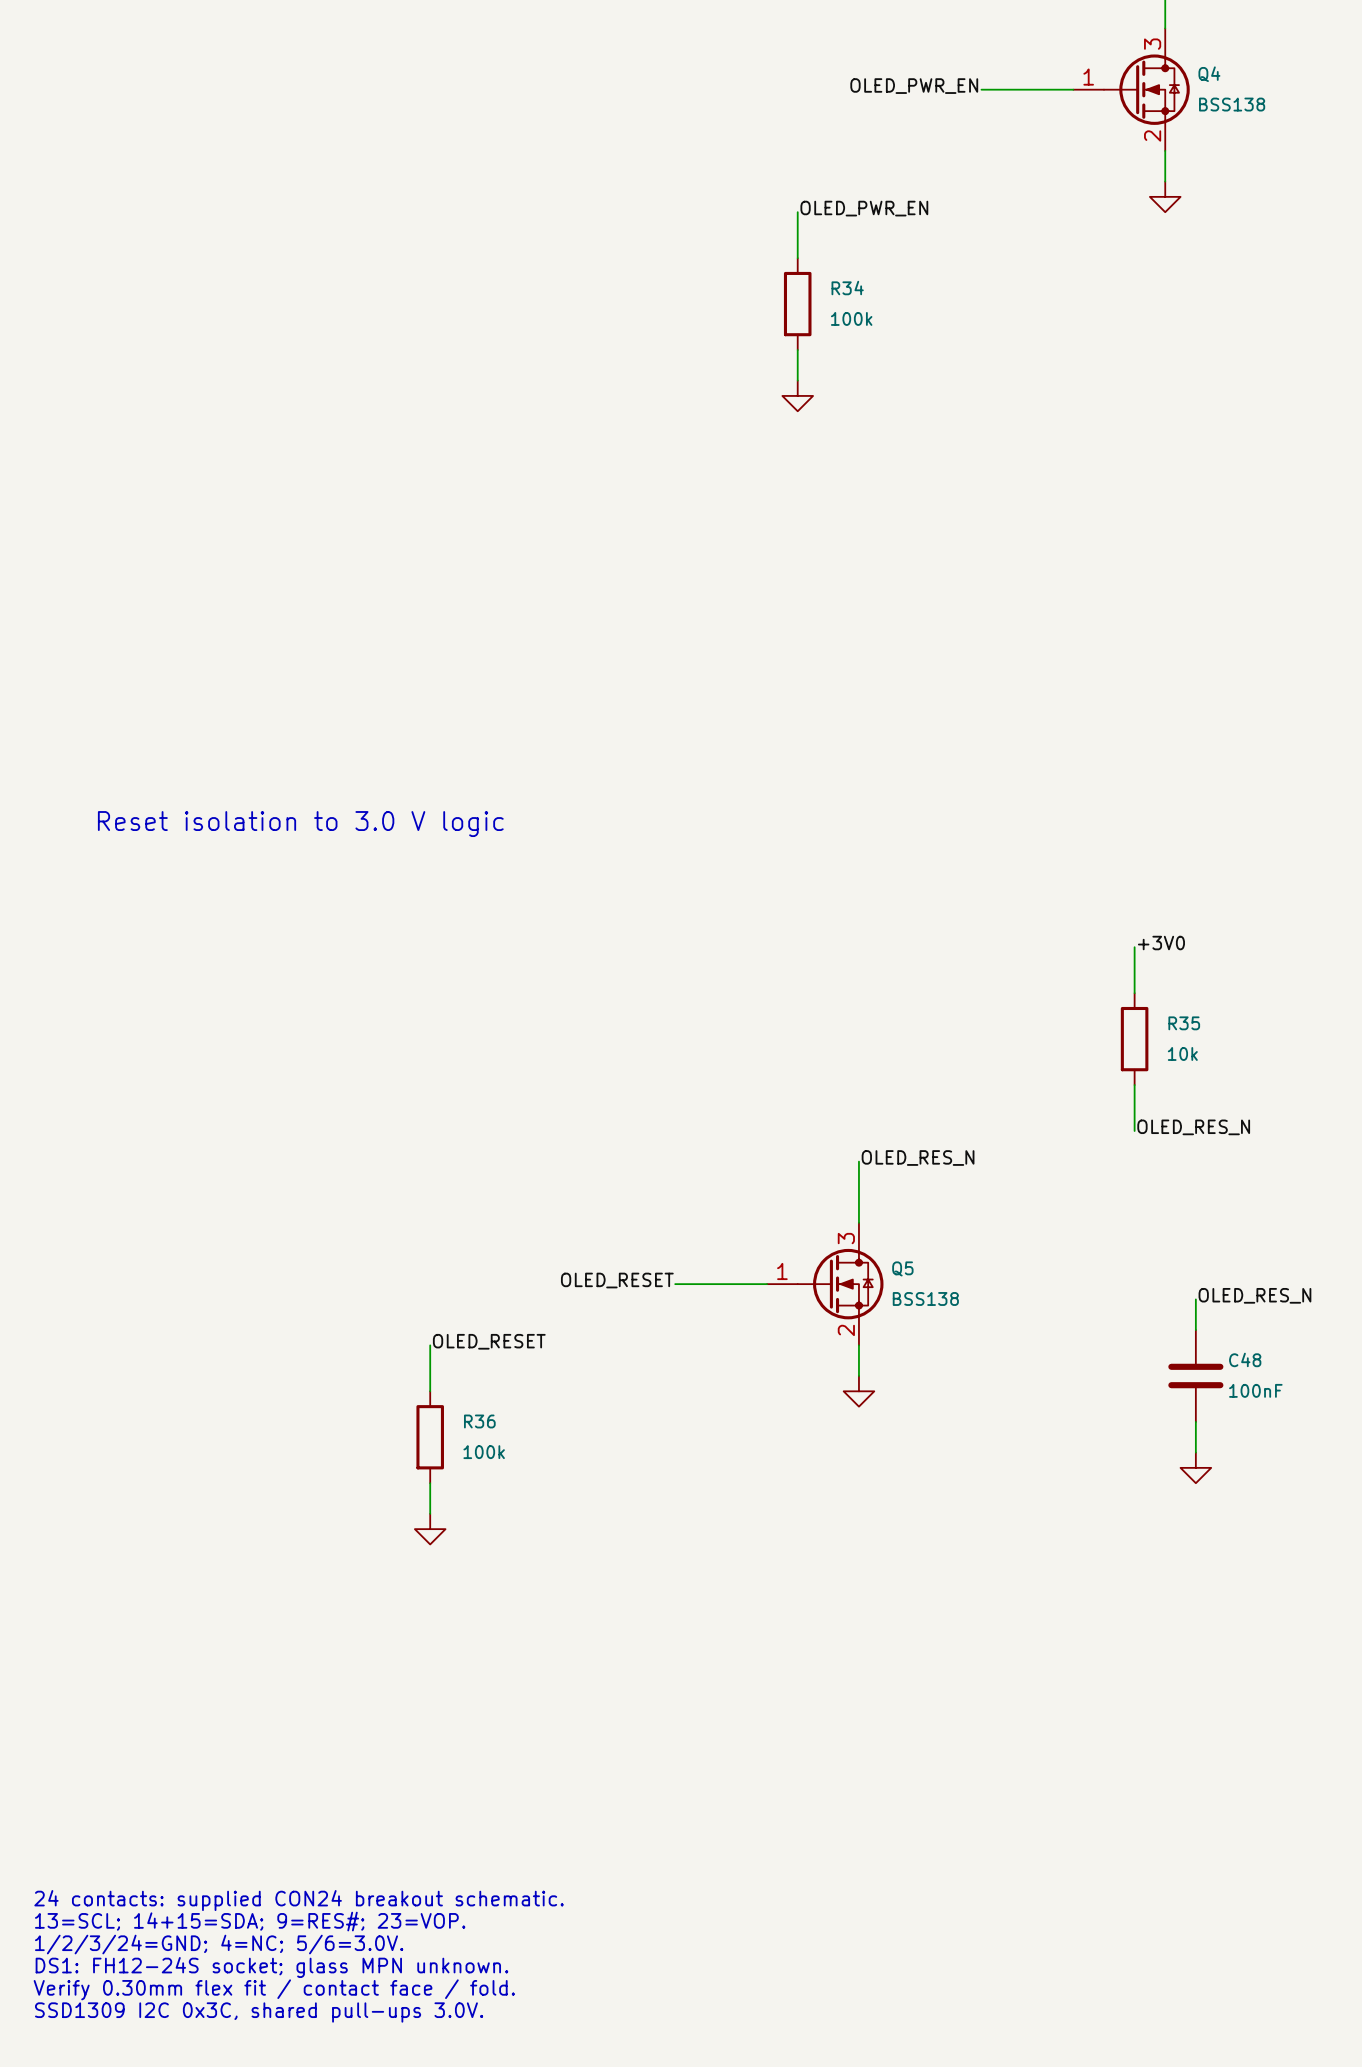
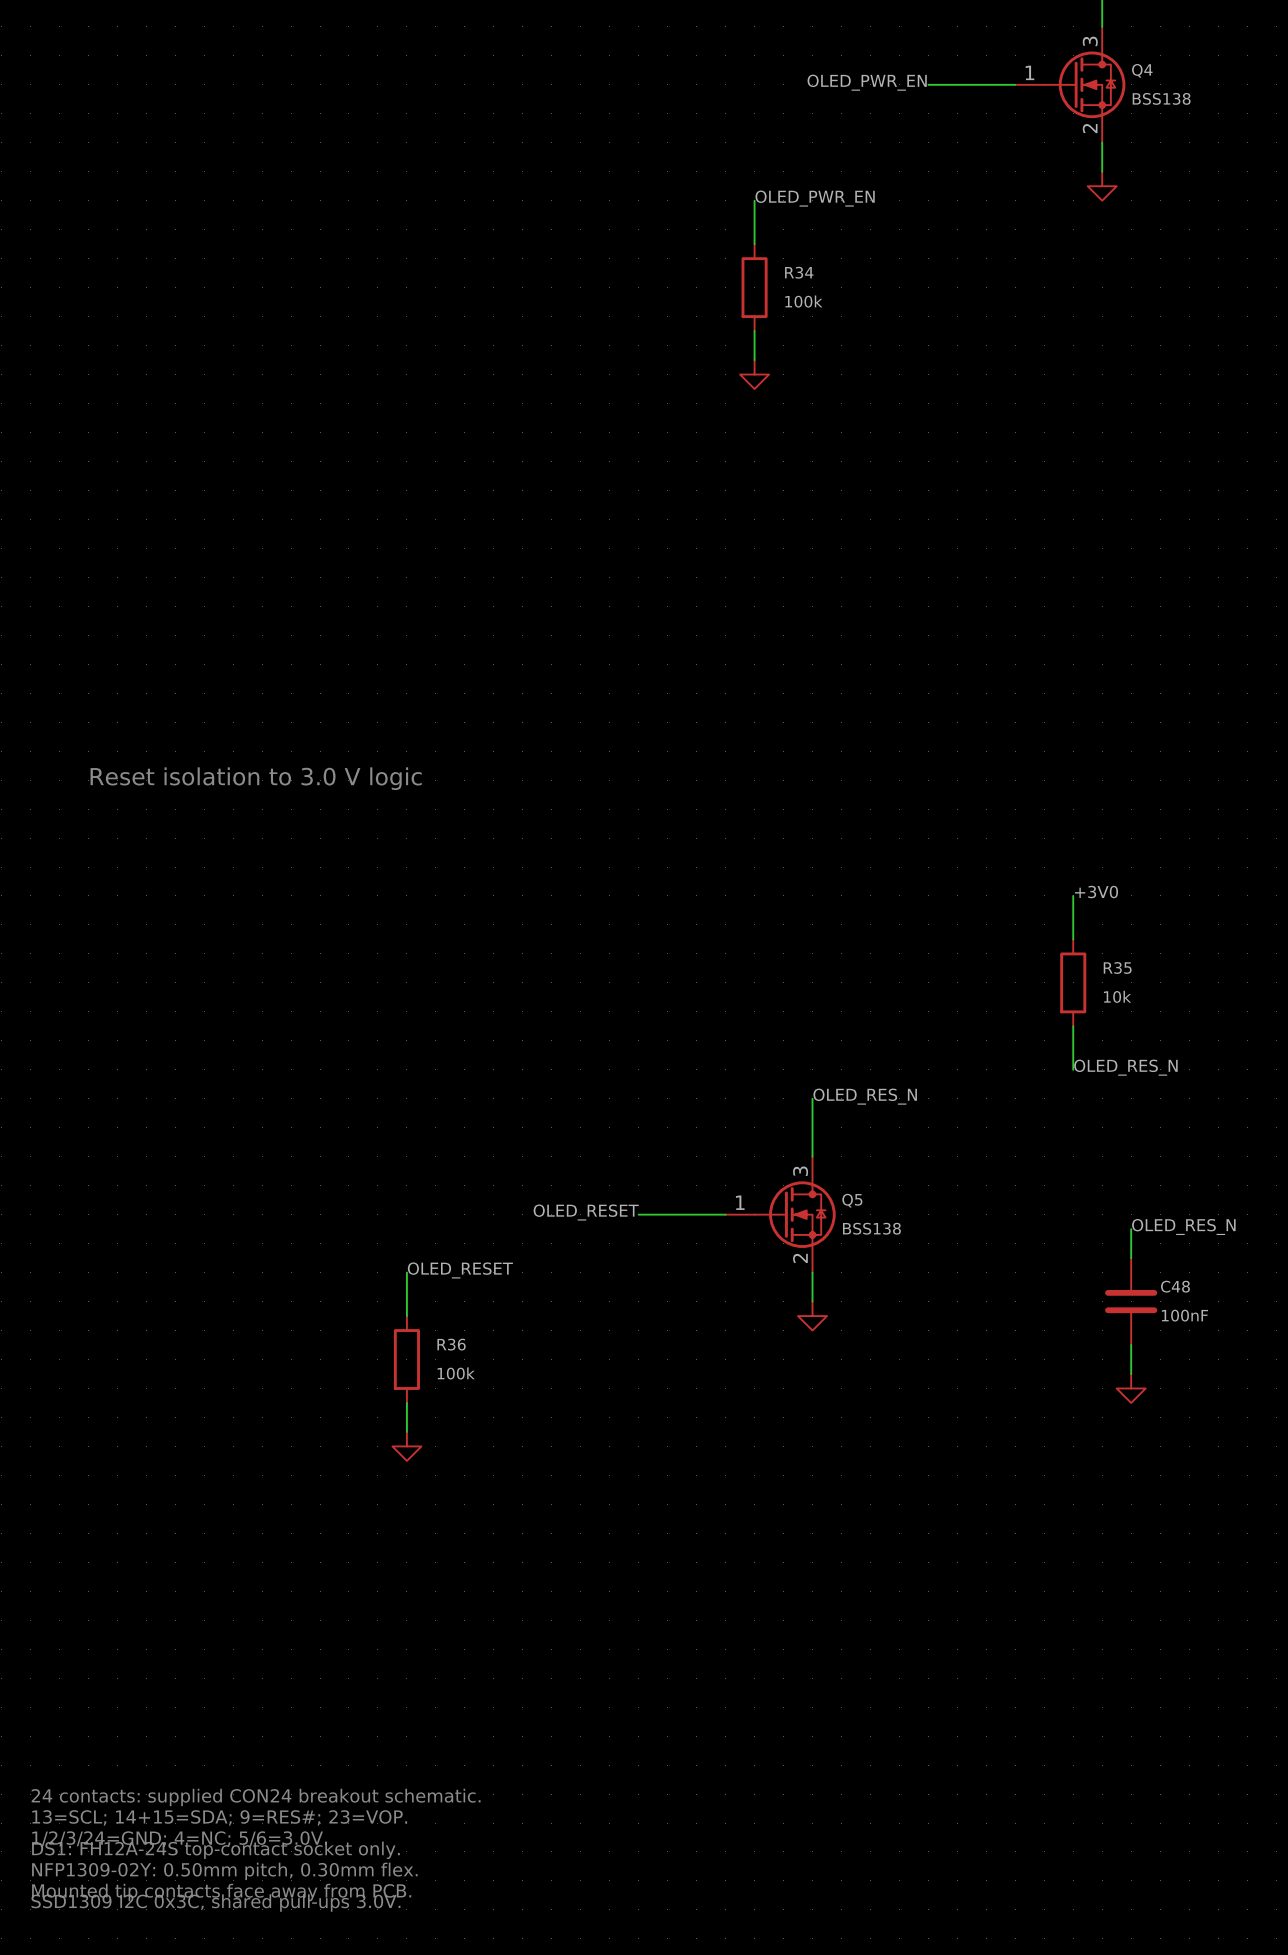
text: none -> DS1: FH12A-24S top-contact socket only. (215, 1850)
text: DS1: FH12-24S socket; glass MPN unknown. (271, 1967) -> none
text: none -> NFP1309-02Y: 0.50mm pitch, 0.30mm flex. (224, 1871)
text: Verify 0.30mm flex fit / contact face / fold. (274, 1989) -> none
text: none -> Mounted tip contacts face away from PCB. (221, 1892)

